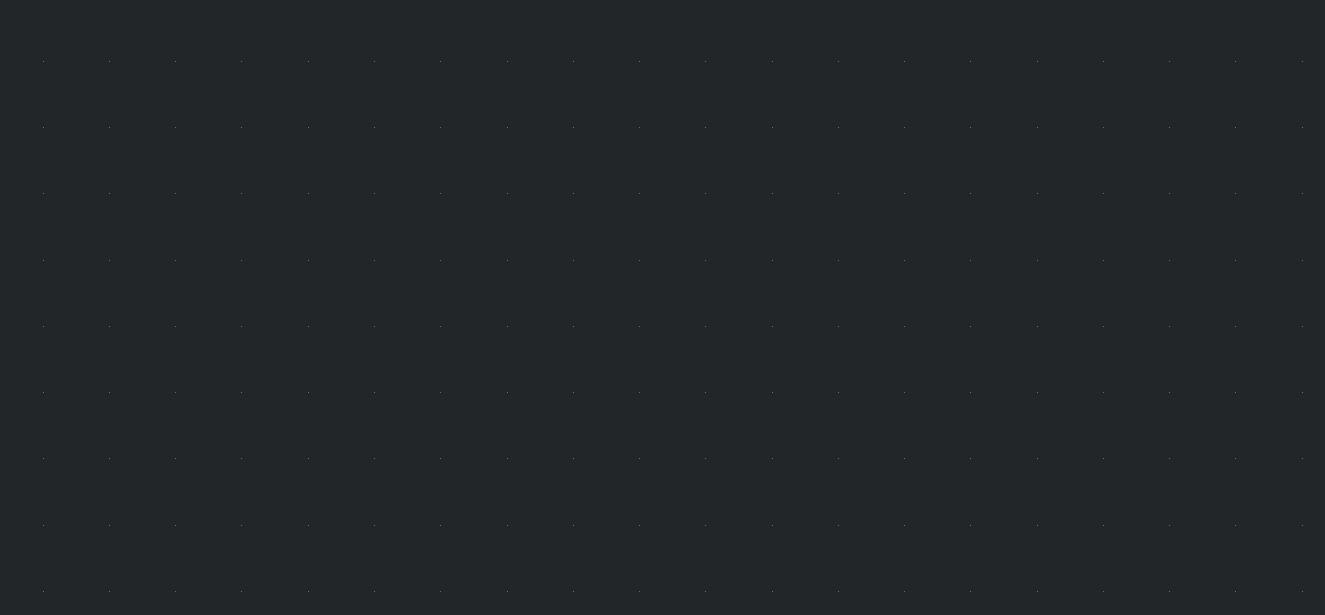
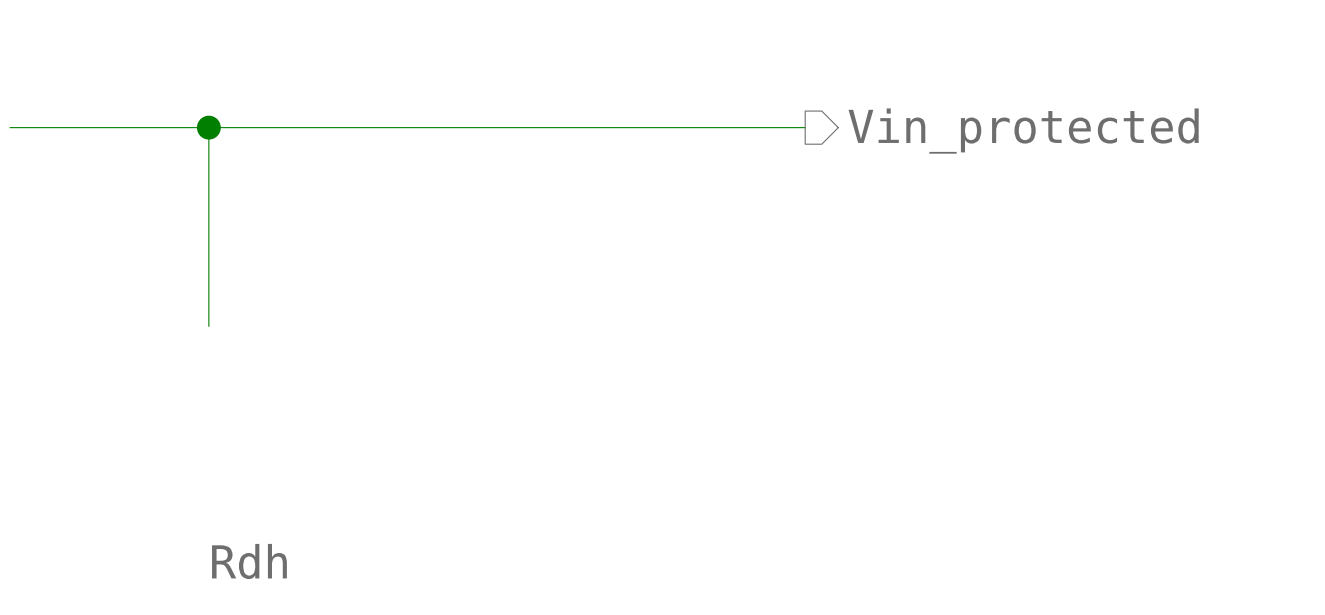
wire: none -> (10, 127) (805, 127)
wire: none -> (208, 127) (208, 326)
junction: none -> (208, 127)
hierarchical label: none -> Vin_protected (1023, 131)
label: none -> Rdh (249, 561)

